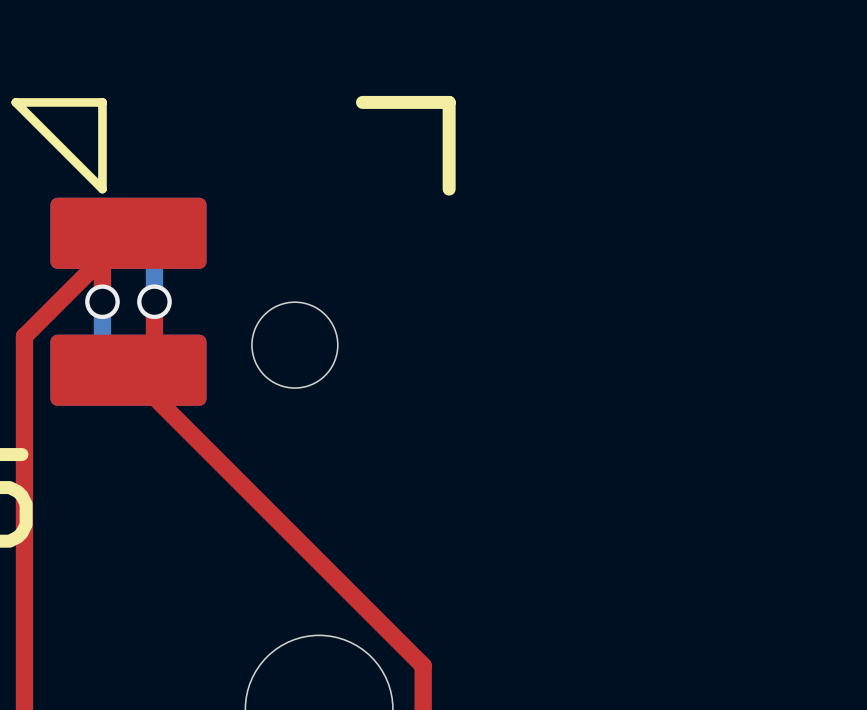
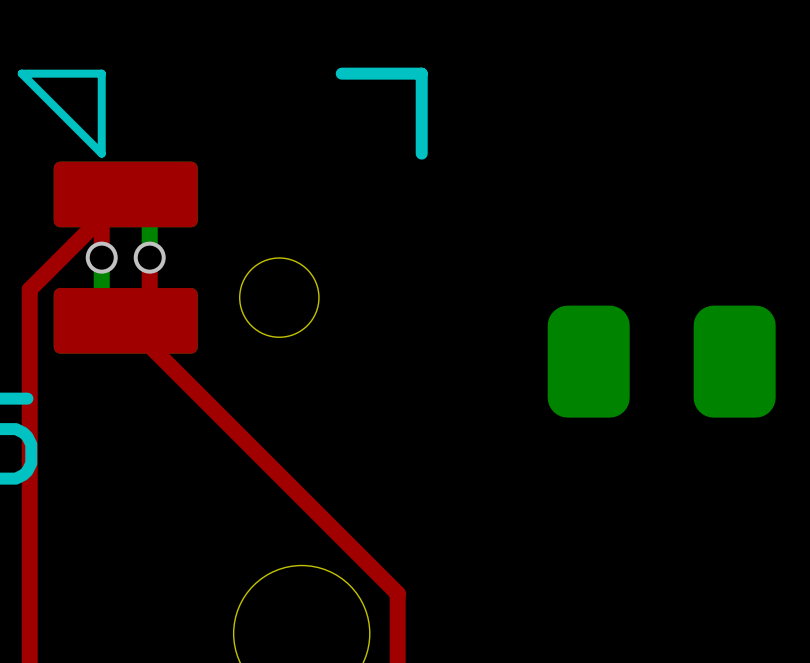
part: none -> (661, 361)

